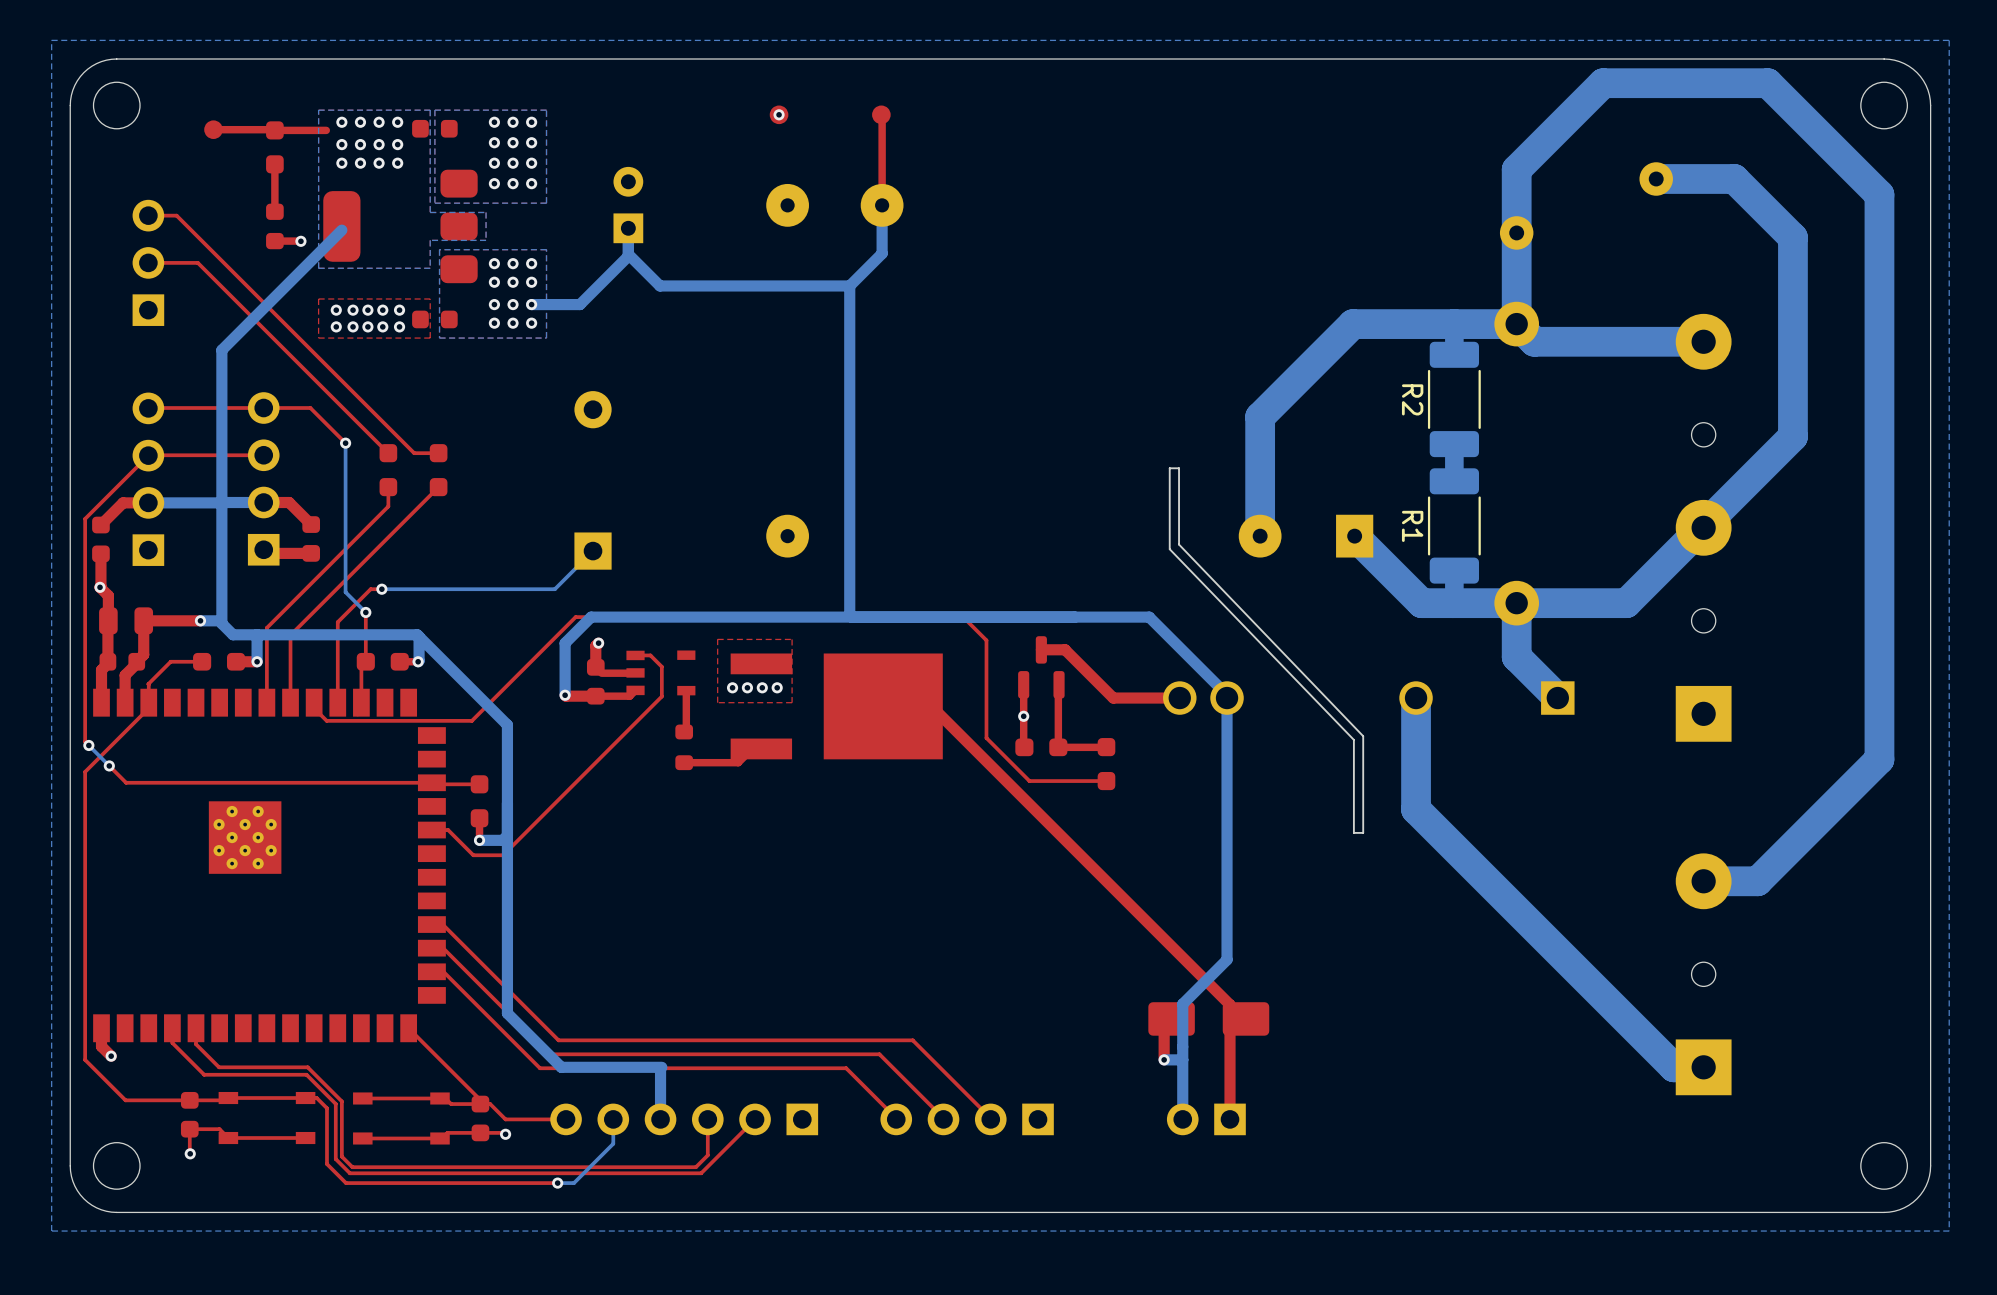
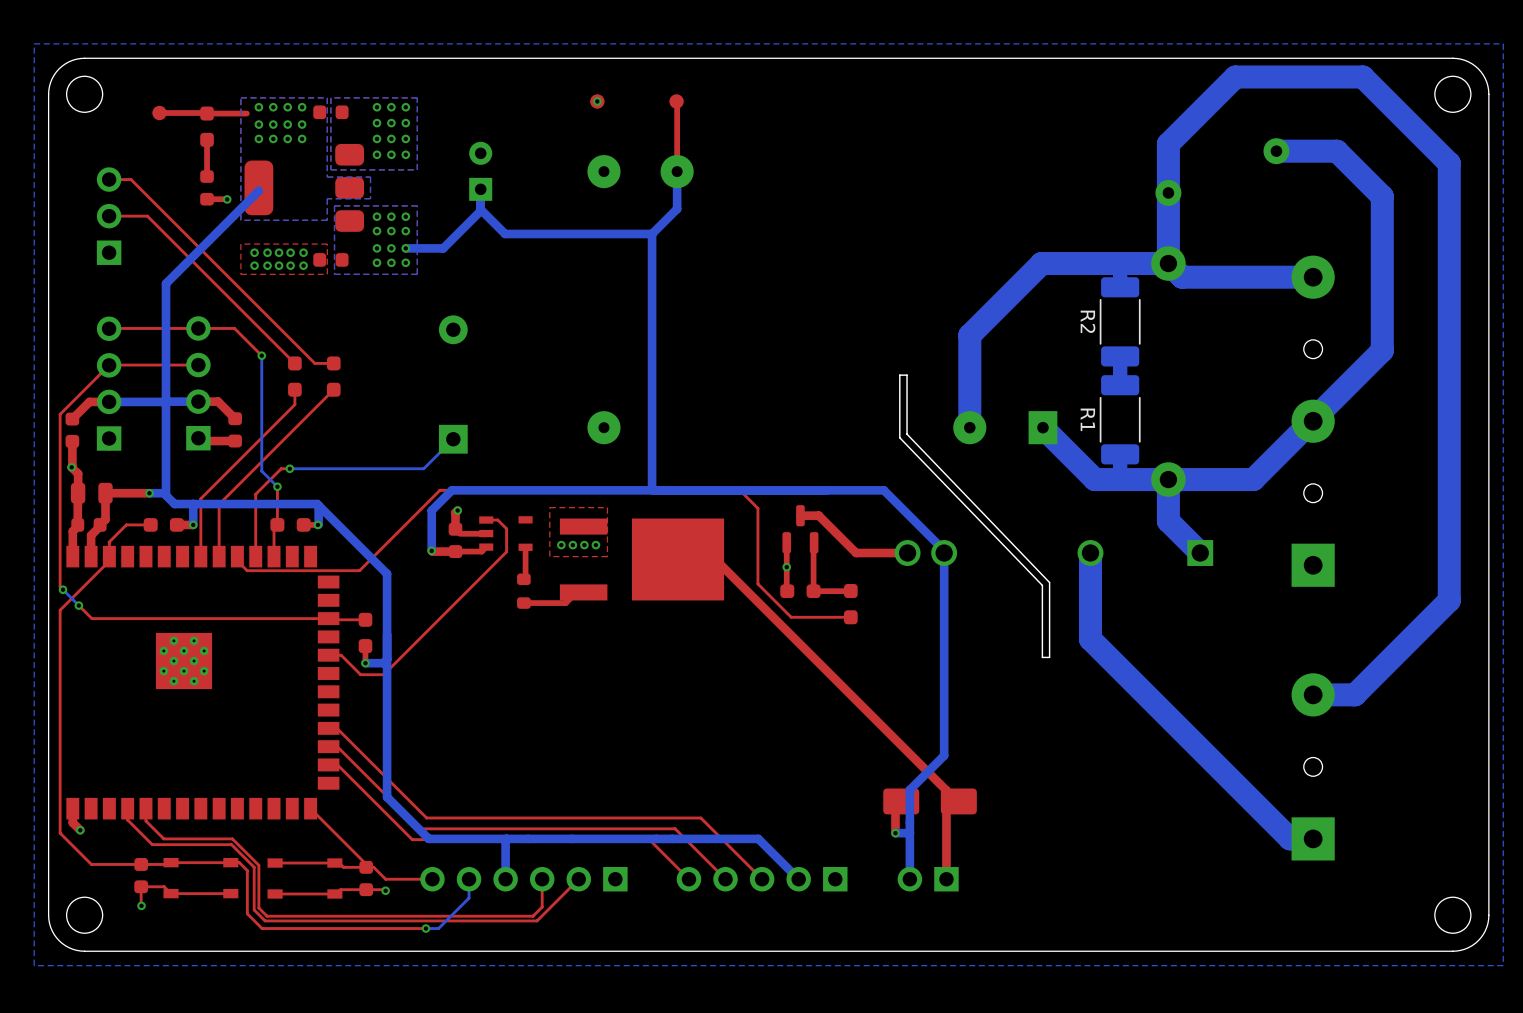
bottom track: none -> (505, 839) (758, 838) (798, 879)
part: (967, 1119) -> none
part: none -> (762, 879)

